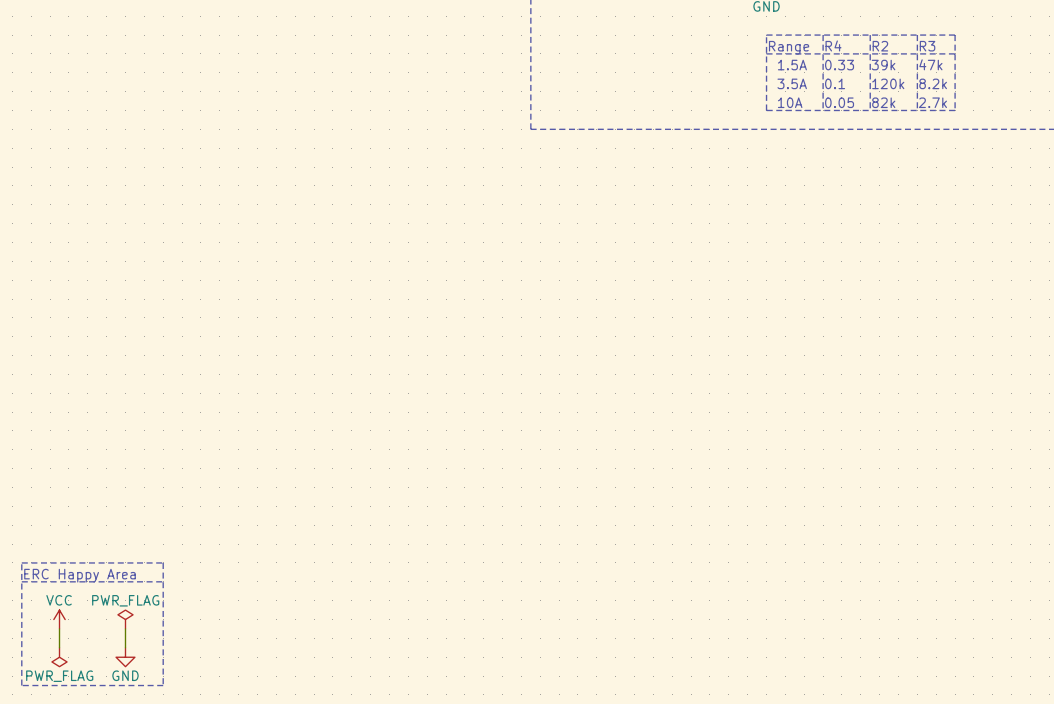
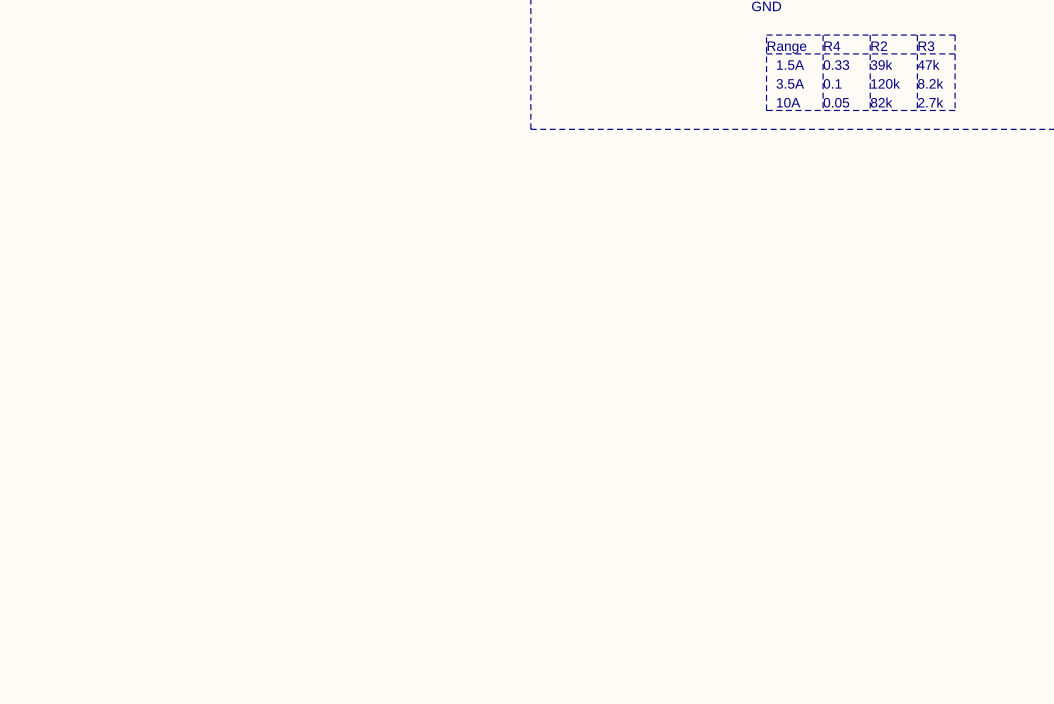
line: (21, 562) (21, 685) (163, 685) (163, 562) (21, 562) -> none
text: ERC Happy Area (80, 575) -> none
line: (21, 581) (163, 581) -> none
power symbol: VCC (59, 619) -> none
power symbol: PWR_FLAG (125, 619) -> none
wire: (59, 628) (59, 647) -> none
wire: (125, 628) (125, 647) -> none
power symbol: PWR_FLAG (59, 657) -> none
power symbol: GND (125, 657) -> none

